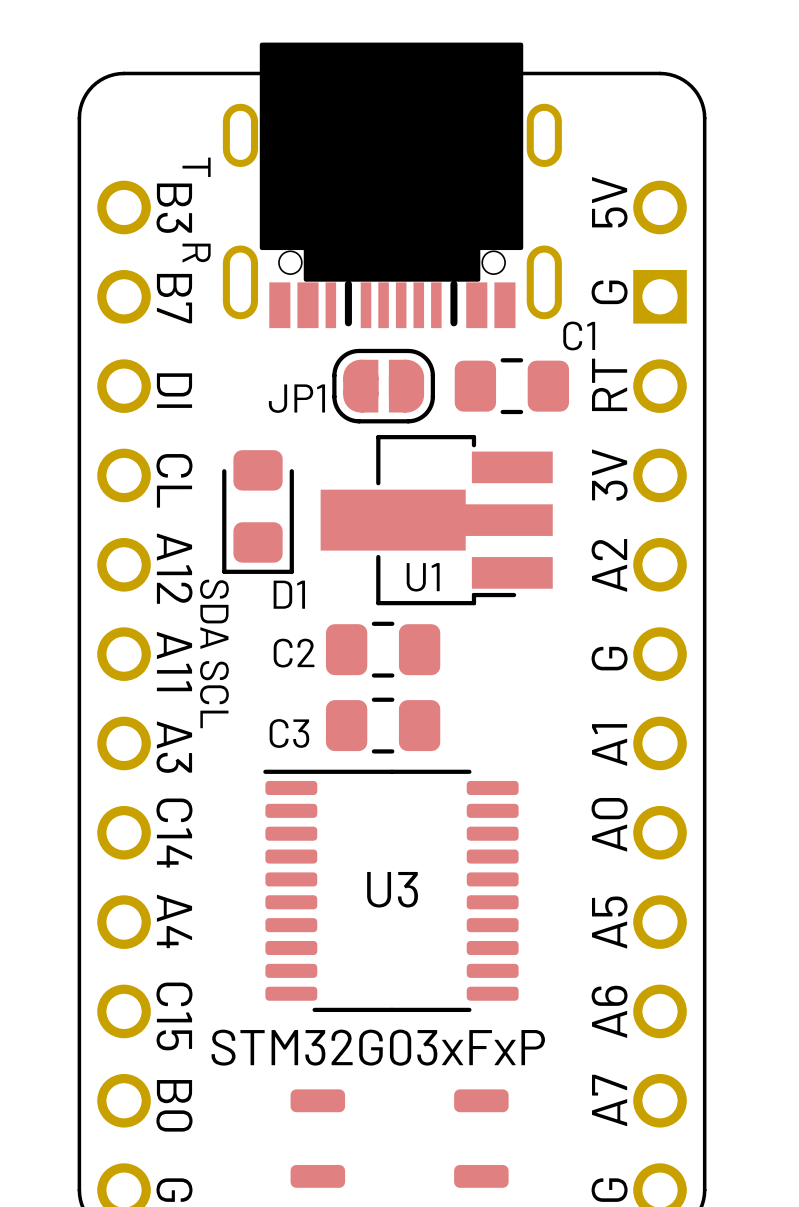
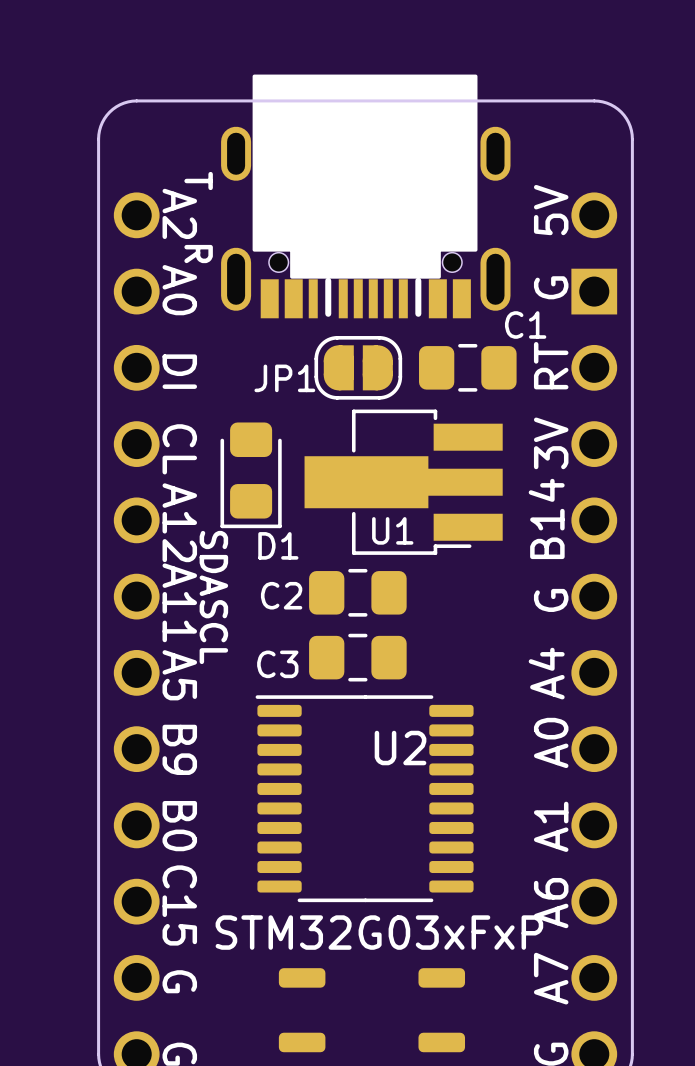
text: B3 (174, 208) -> A2 (179, 213)
text: B7 (174, 298) -> A0 (179, 290)
text: A2 (609, 565) -> B14 (546, 518)
text: A1 (609, 744) -> A4 (546, 673)
text: A3 (174, 747) -> A5 (179, 675)
text: C14 (174, 833) -> B9 (179, 749)
U3 name: U3 (392, 889) -> U2 (400, 748)
text: A4 (174, 921) -> B0 (179, 826)
text: A5 (609, 922) -> A1 (551, 826)
text: B0 (174, 1105) -> G (179, 981)

